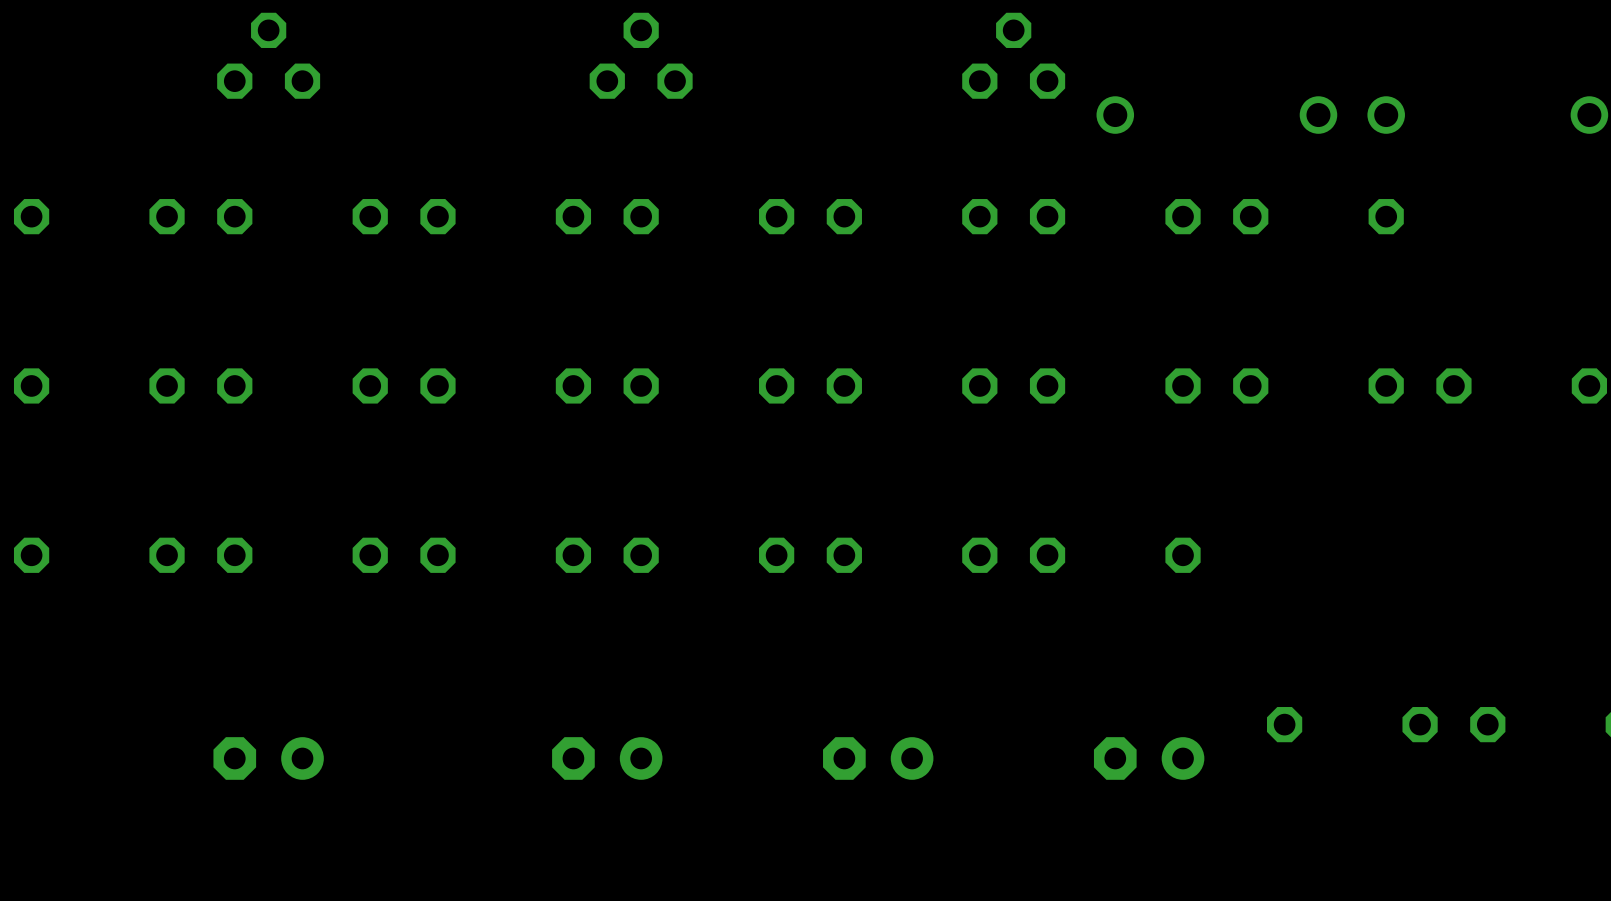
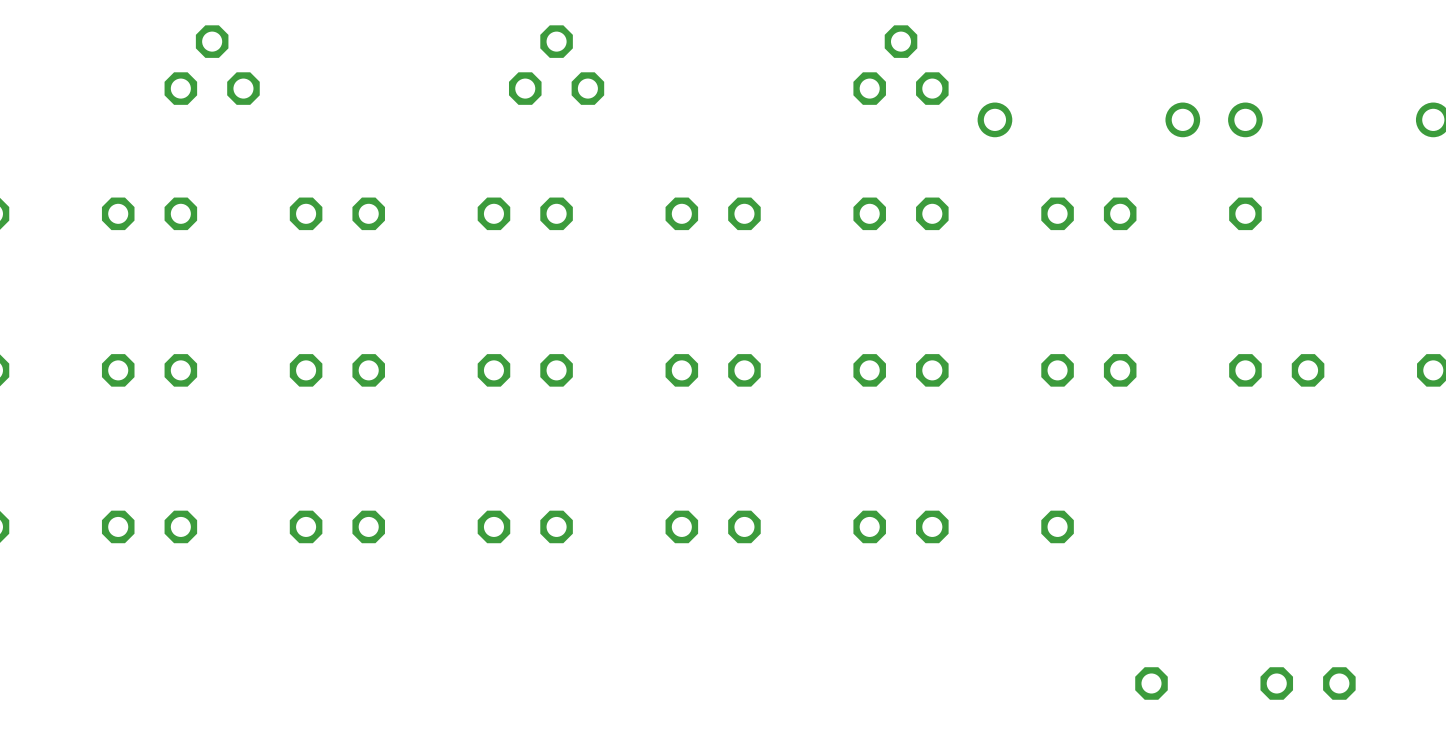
part: (268, 758) -> none
part: (607, 758) -> none
part: (878, 758) -> none
part: (1149, 758) -> none

